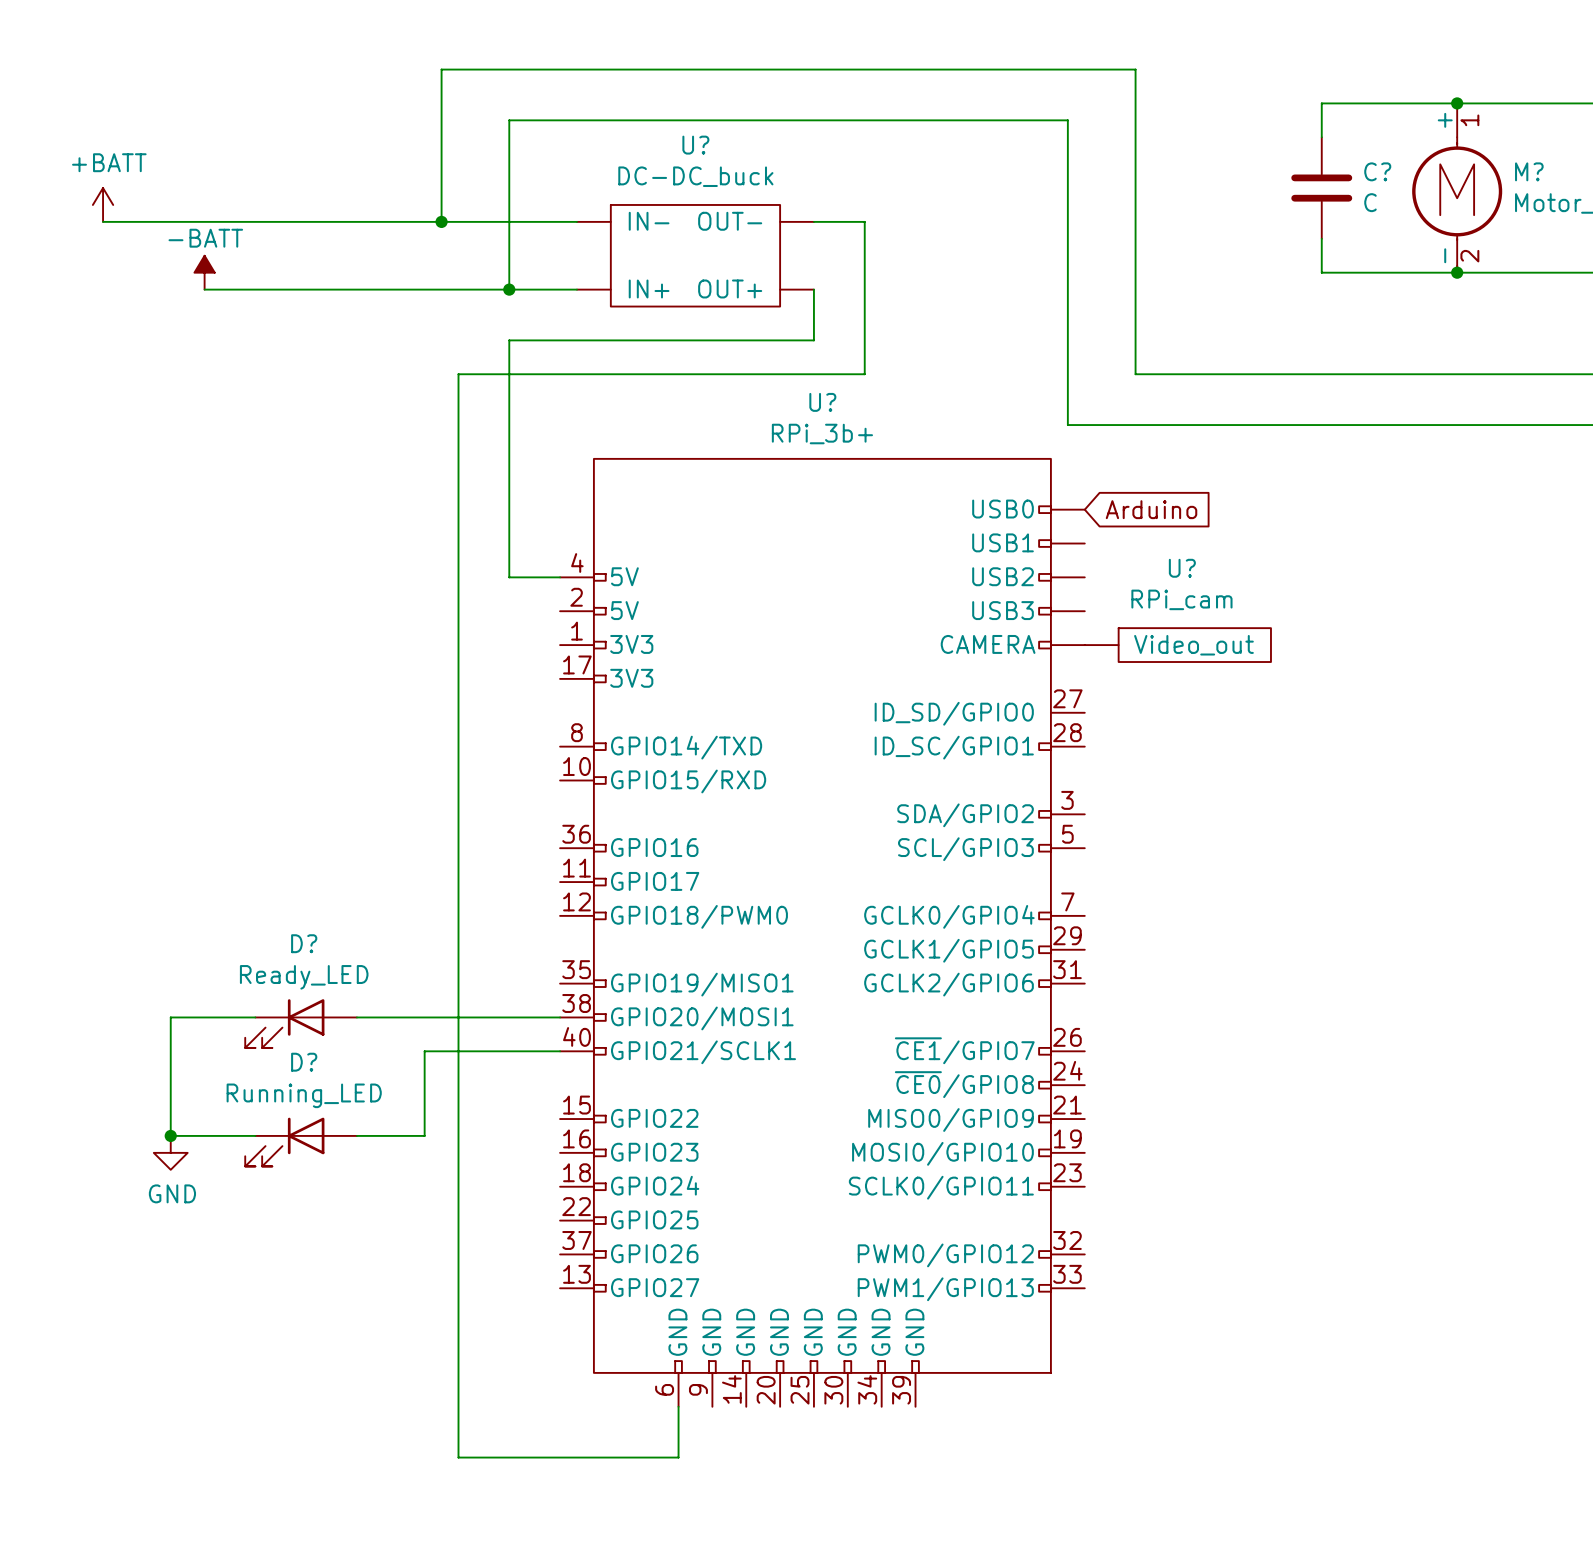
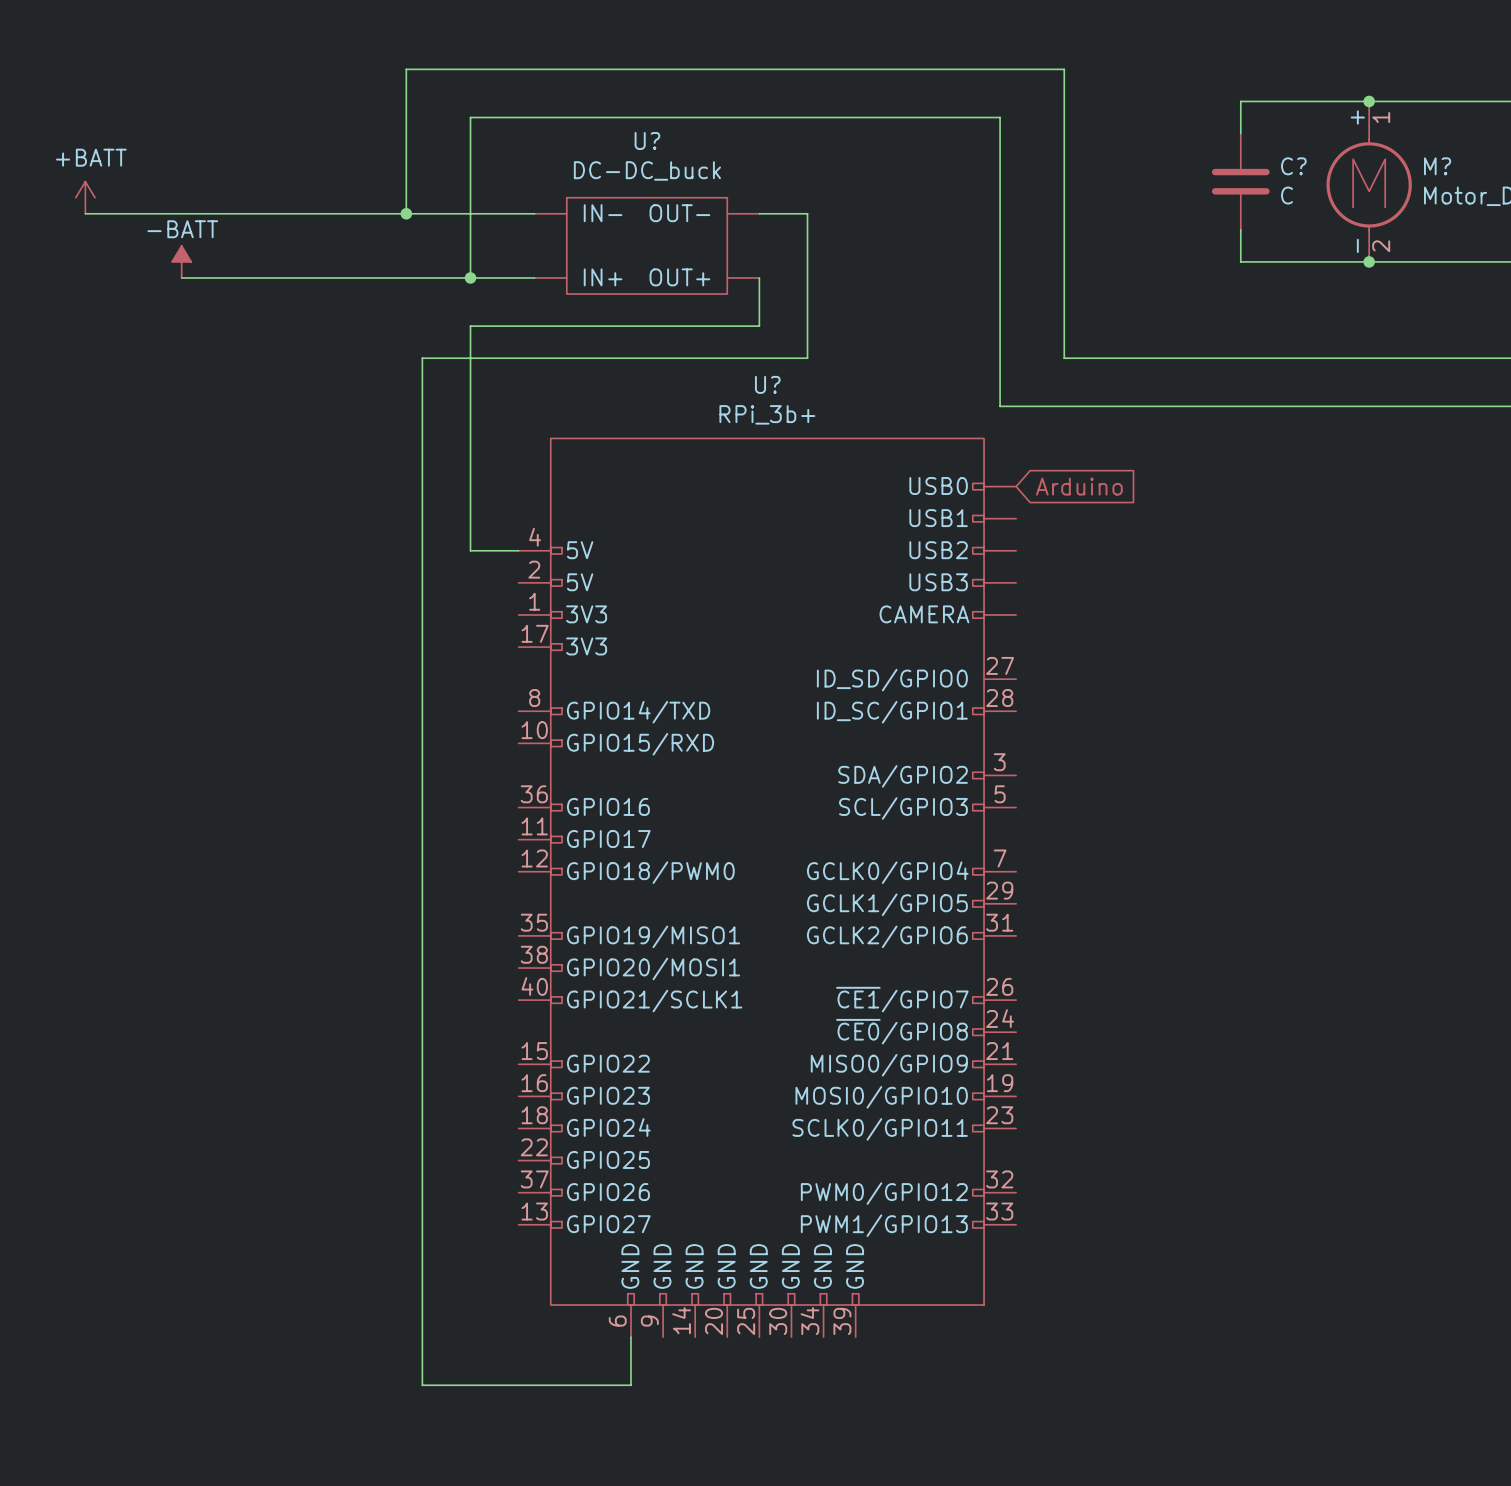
U?: RPi_cam (1177, 645) -> none
wire: (255, 1017) (170, 1017) (170, 1135) (255, 1135) -> none
wire: (356, 1017) (560, 1017) -> none
D?: Ready_LED (301, 1023) -> none
wire: (560, 1051) (424, 1051) (424, 1135) (356, 1135) -> none
junction: (170, 1135) -> none
D?: Running_LED (301, 1142) -> none
power symbol: GND (170, 1152) -> none

